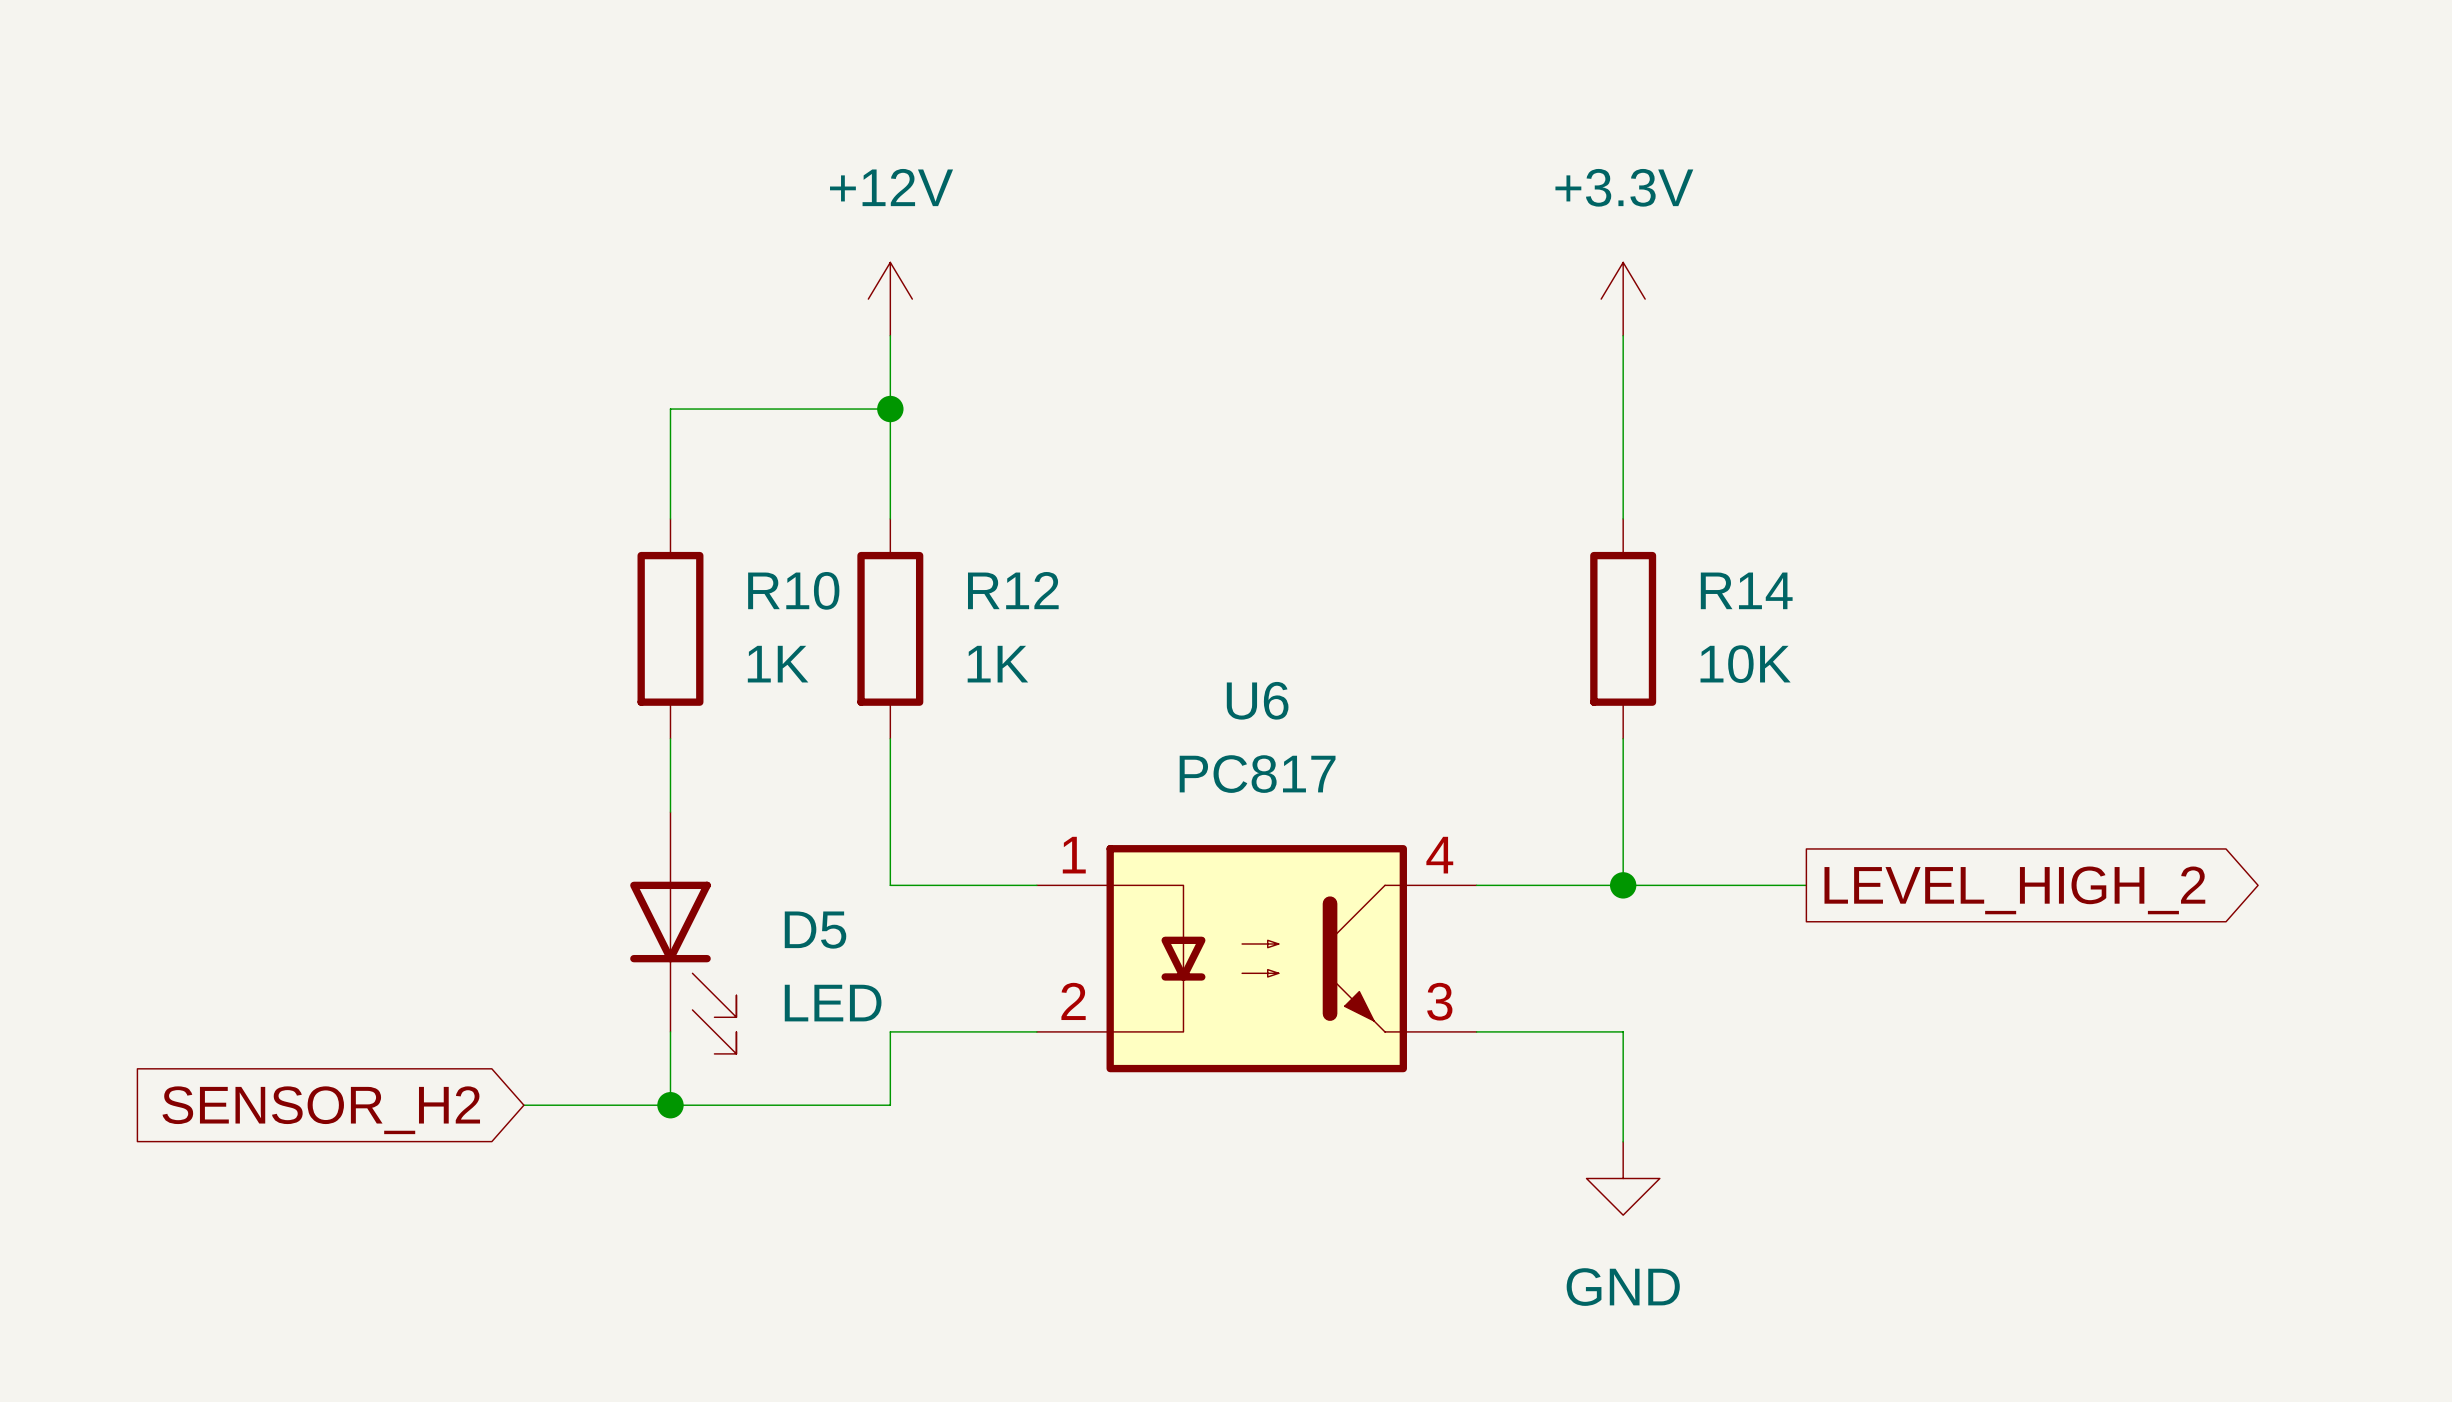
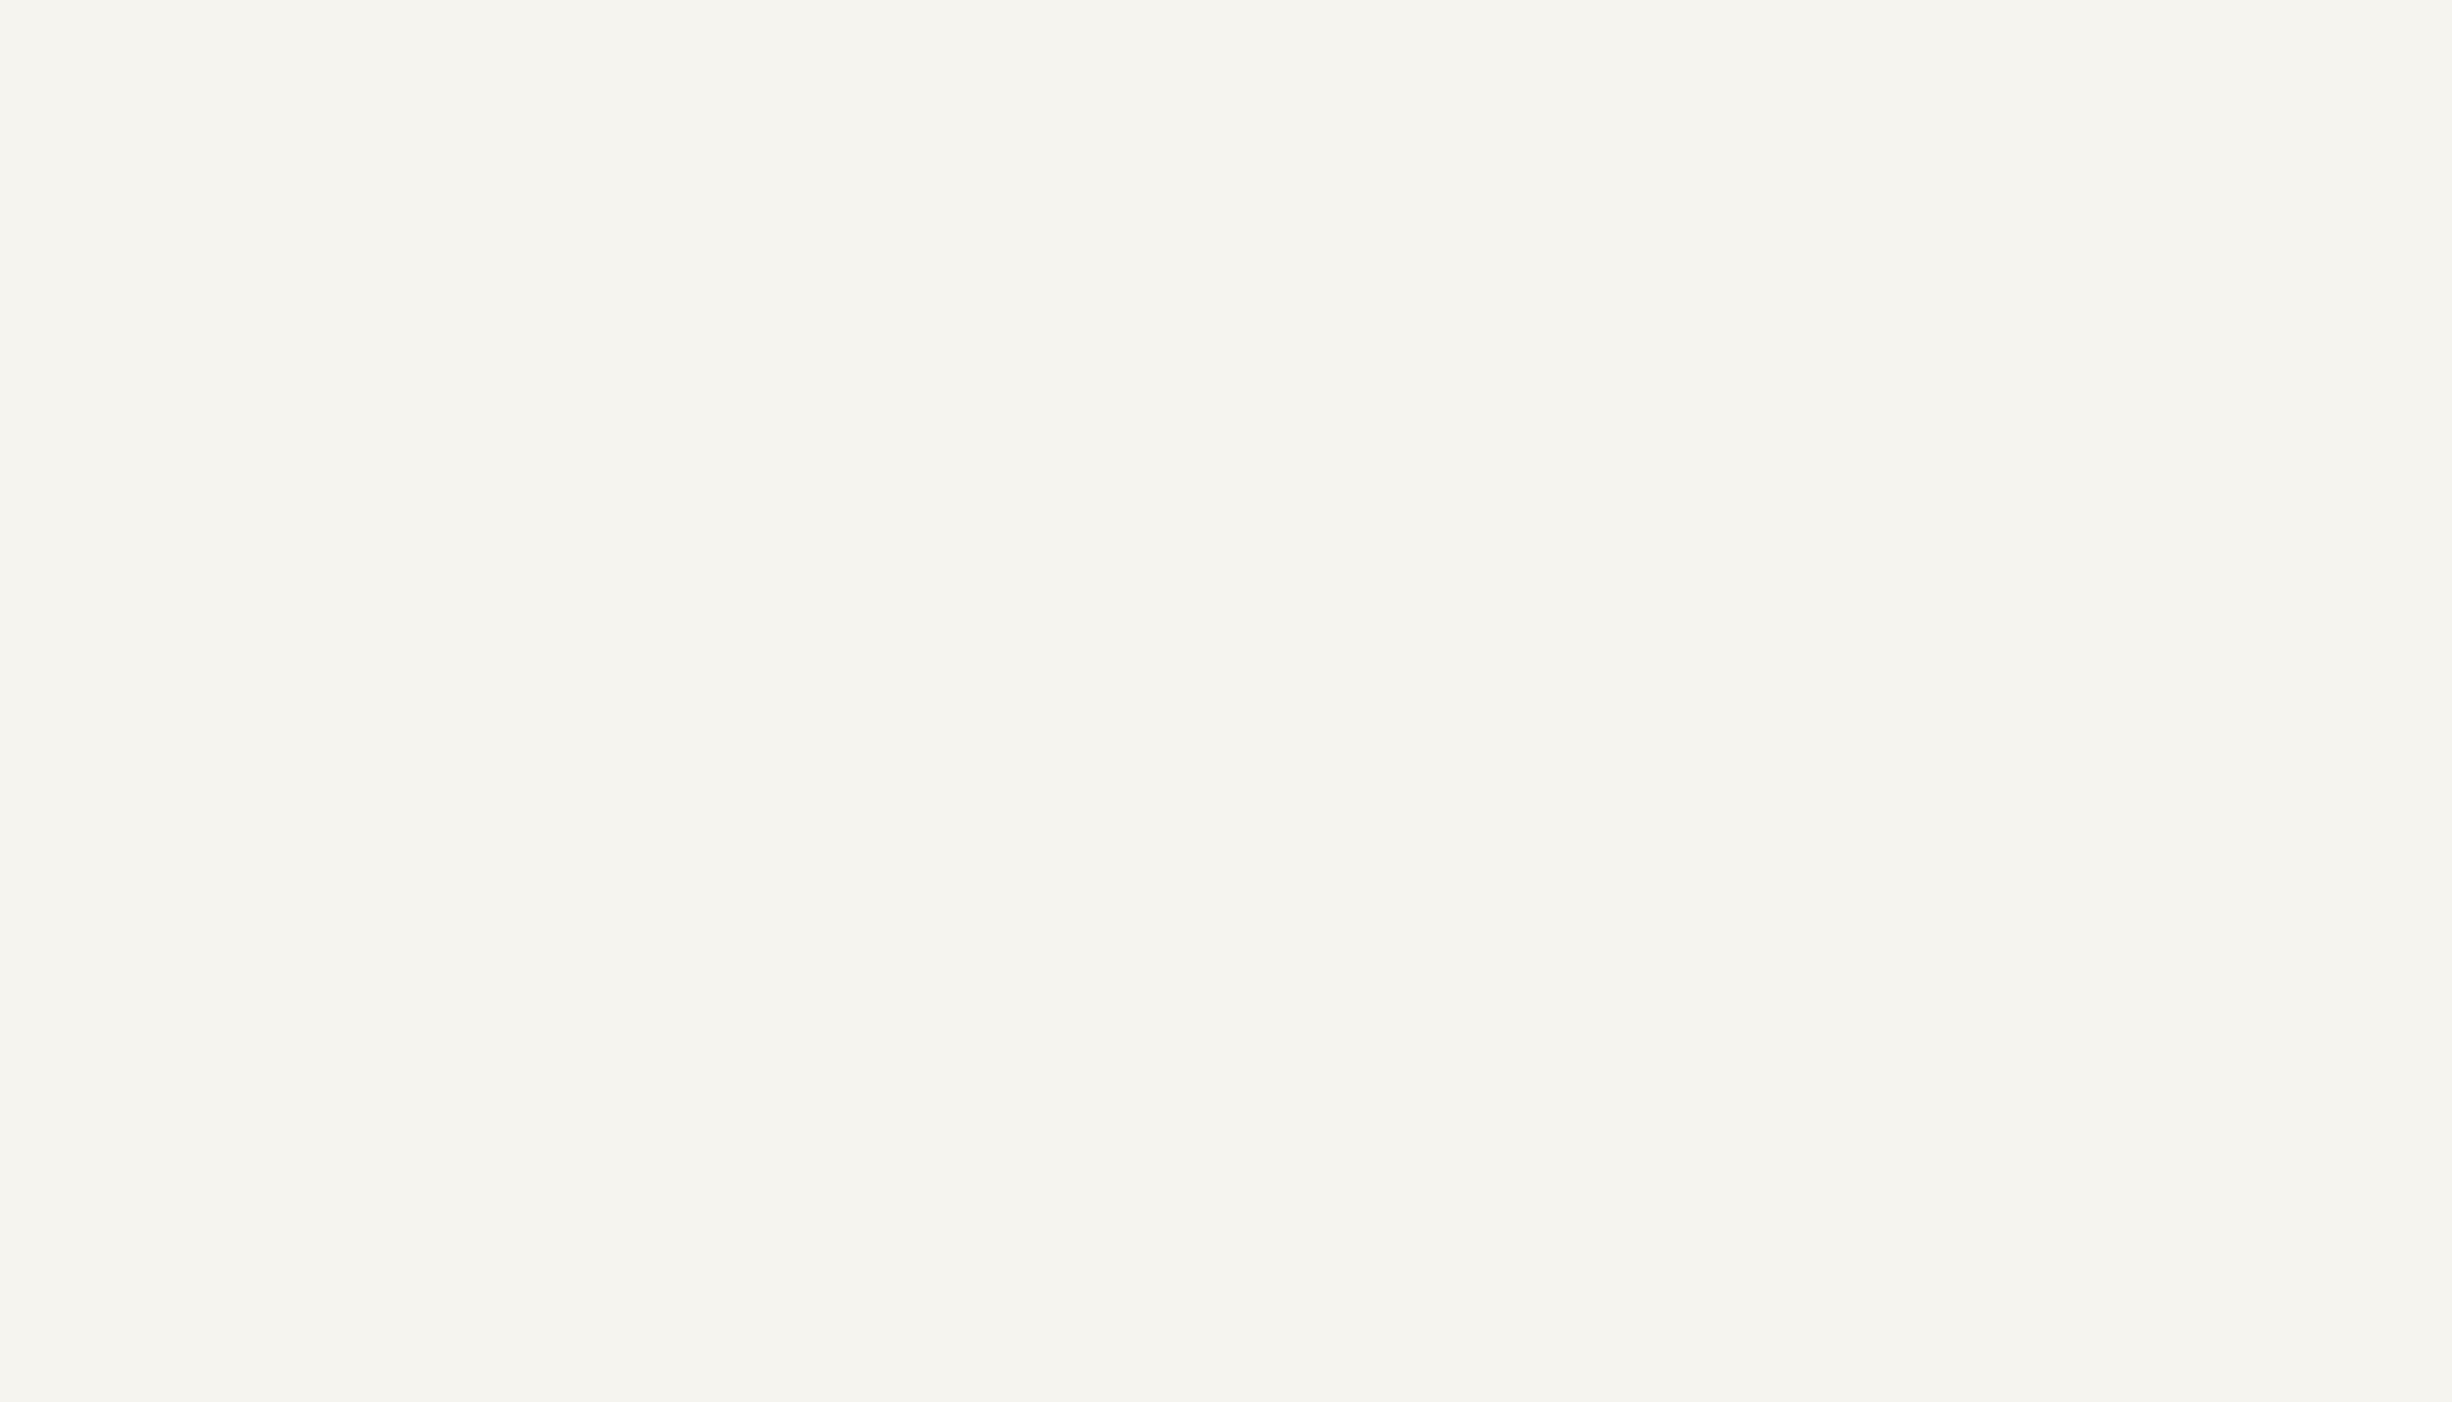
power symbol: +12V (890, 299) -> none
power symbol: +3.3V (1623, 299) -> none
wire: (890, 335) (890, 518) -> none
wire: (1623, 335) (1623, 518) -> none
wire: (890, 409) (670, 409) (670, 518) -> none
junction: (890, 409) -> none
R10: 1K (670, 628) -> none
R12: 1K (890, 628) -> none
R14: 10K (1623, 628) -> none
wire: (670, 738) (670, 812) -> none
wire: (890, 738) (890, 885) (1036, 885) -> none
wire: (1623, 738) (1623, 885) -> none
wire: (1476, 885) (1806, 885) -> none
junction: (1623, 885) -> none
global label: LEVEL_HIGH_2 (2014, 890) -> none
D5: LED (683, 933) -> none
U6: PC817 (1256, 958) -> none
wire: (670, 1031) (670, 1105) -> none
wire: (1036, 1031) (890, 1031) (890, 1105) (523, 1105) -> none
wire: (1476, 1031) (1623, 1031) (1623, 1141) -> none
junction: (670, 1105) -> none
global label: SENSOR_H2 (321, 1110) -> none
power symbol: GND (1623, 1178) -> none

